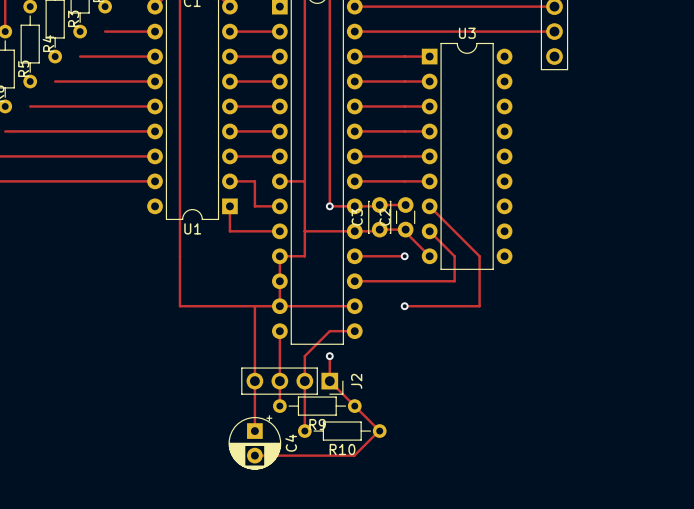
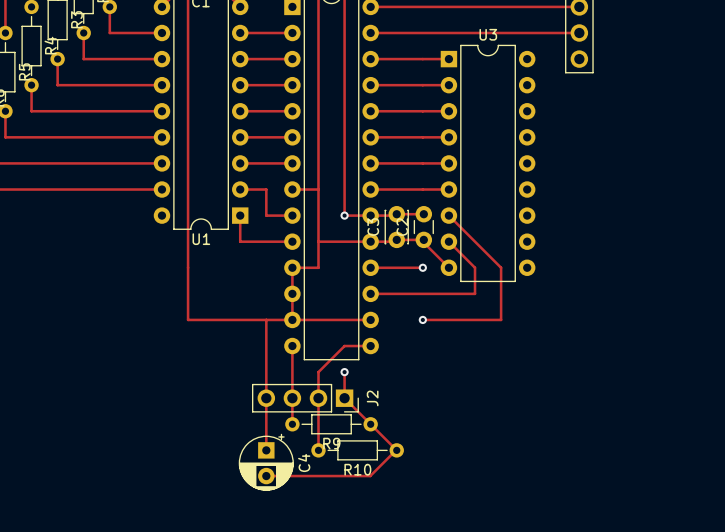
track: none -> (109, 6) (109, 33)
track: none -> (83, 33) (83, 59)
track: none -> (57, 59) (57, 85)
track: none -> (31, 85) (31, 111)
track: none -> (5, 111) (5, 137)

